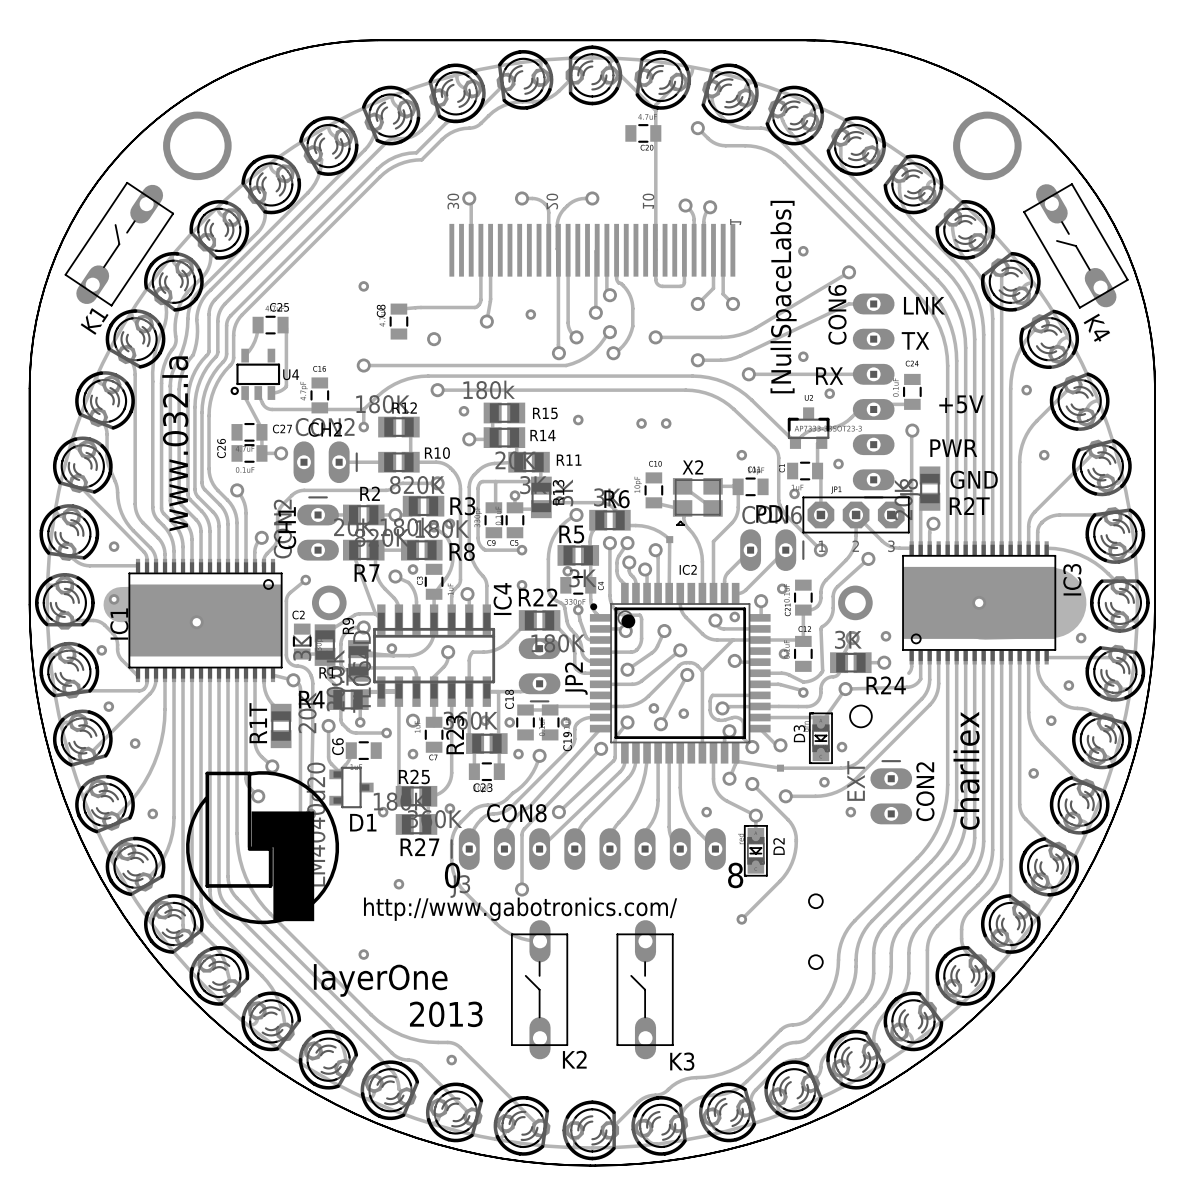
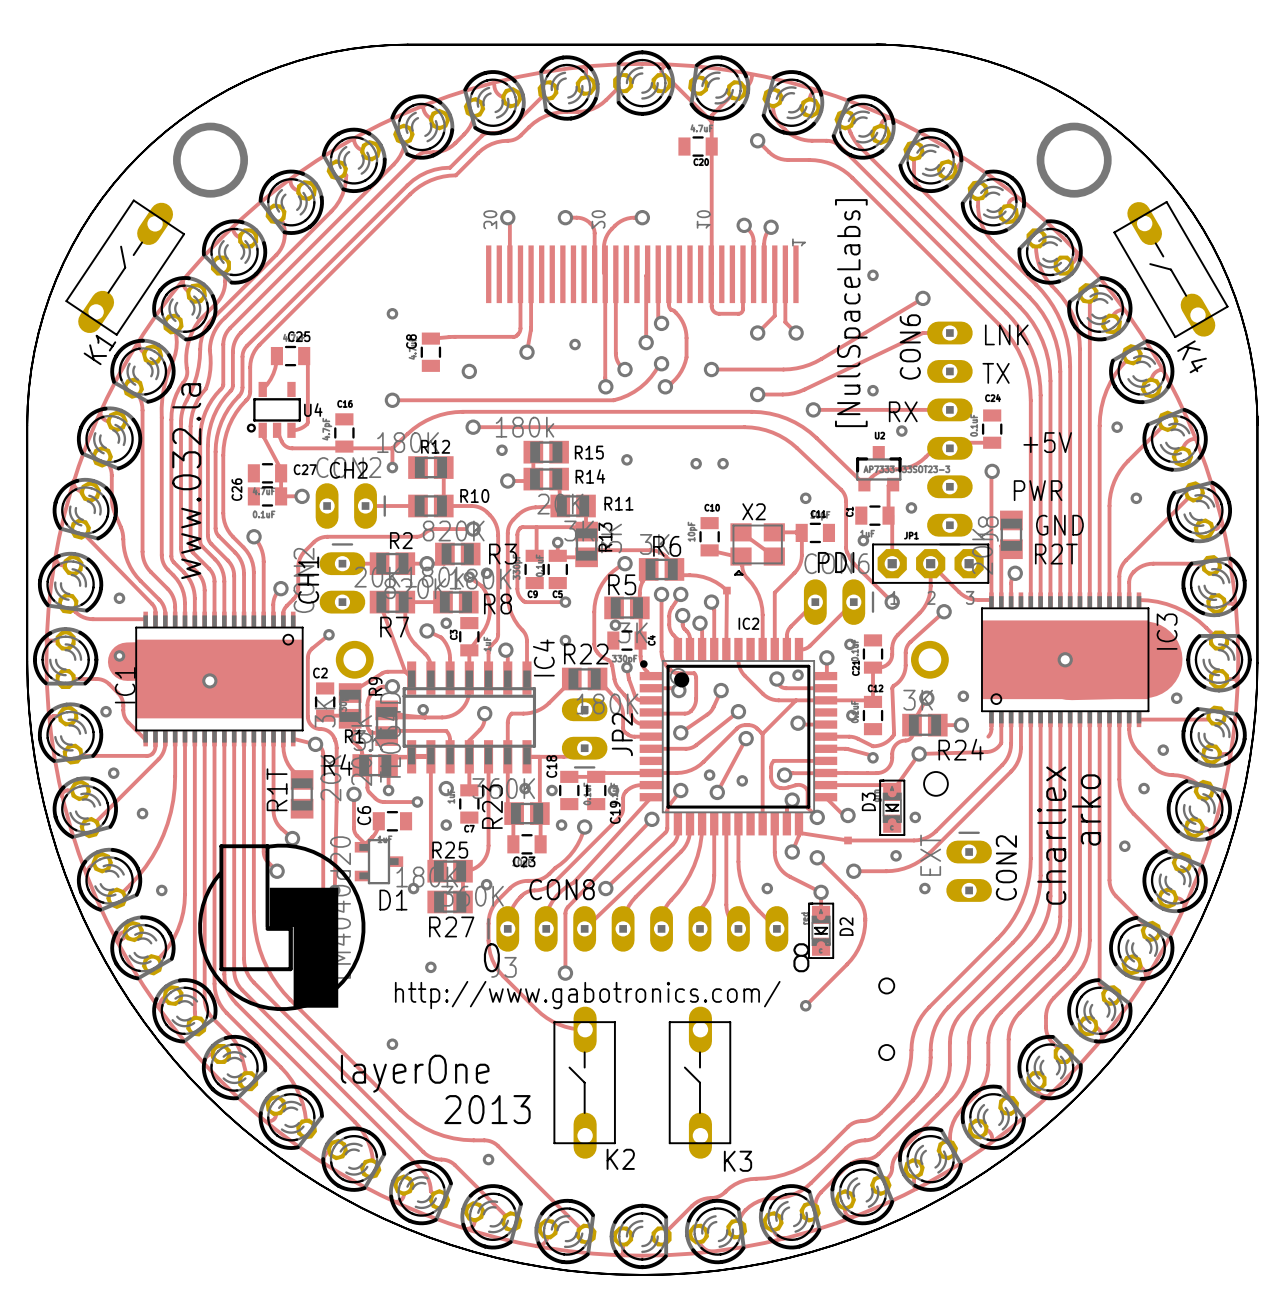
text: none -> arko (1086, 809)

